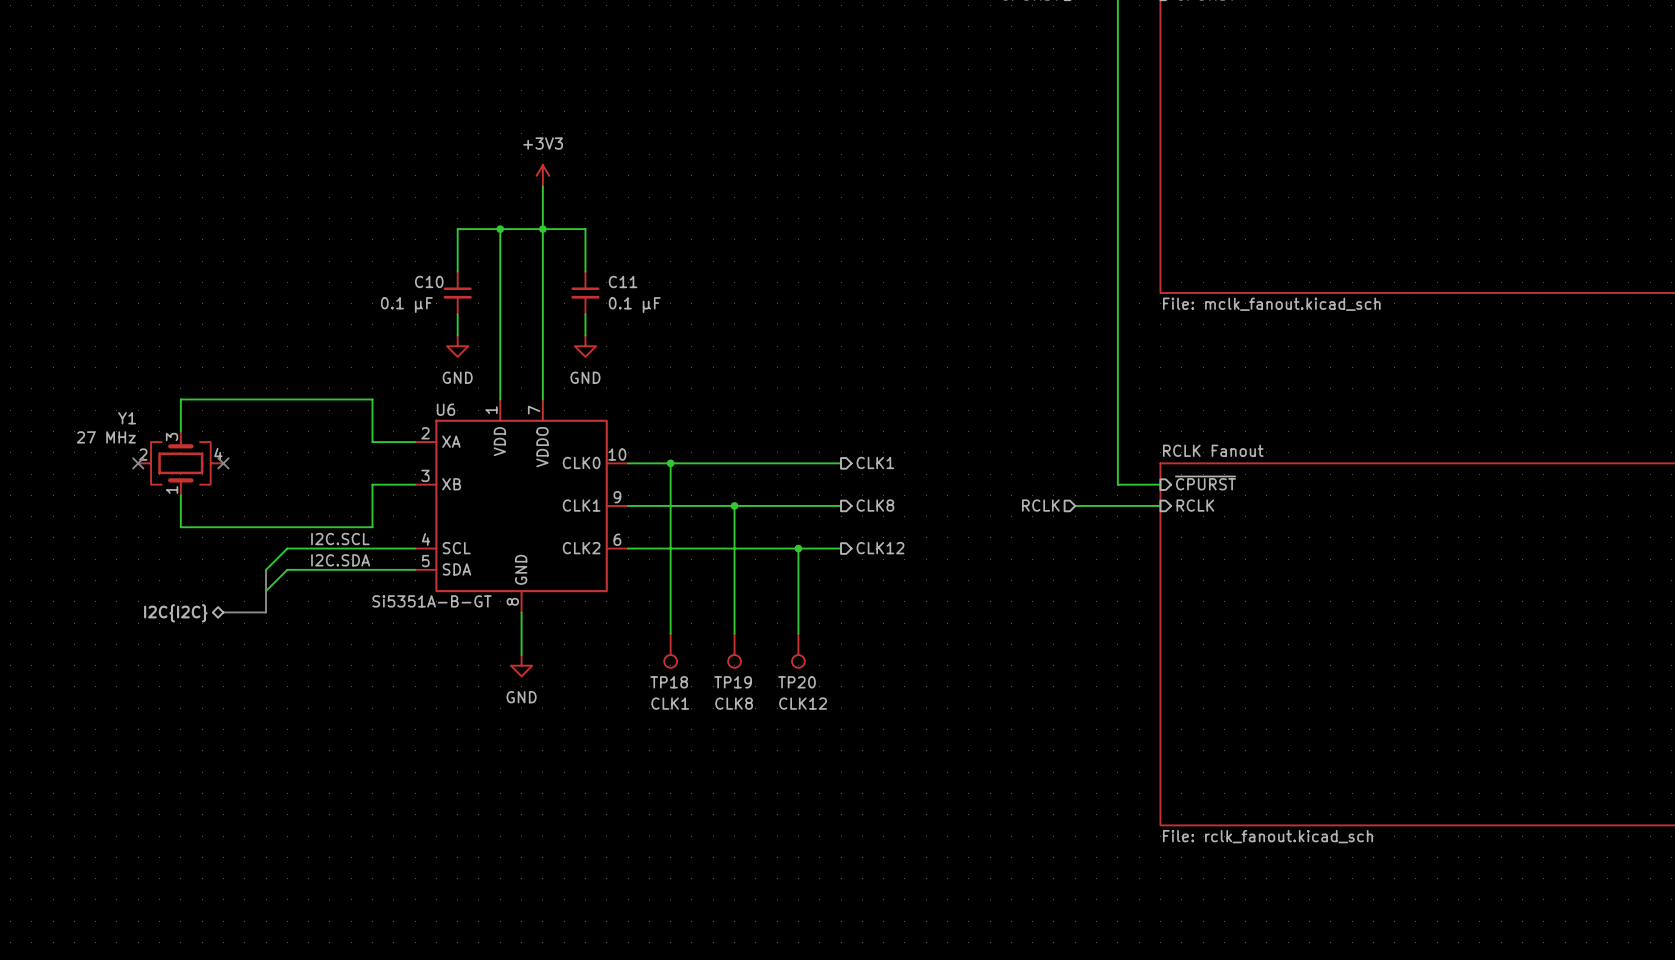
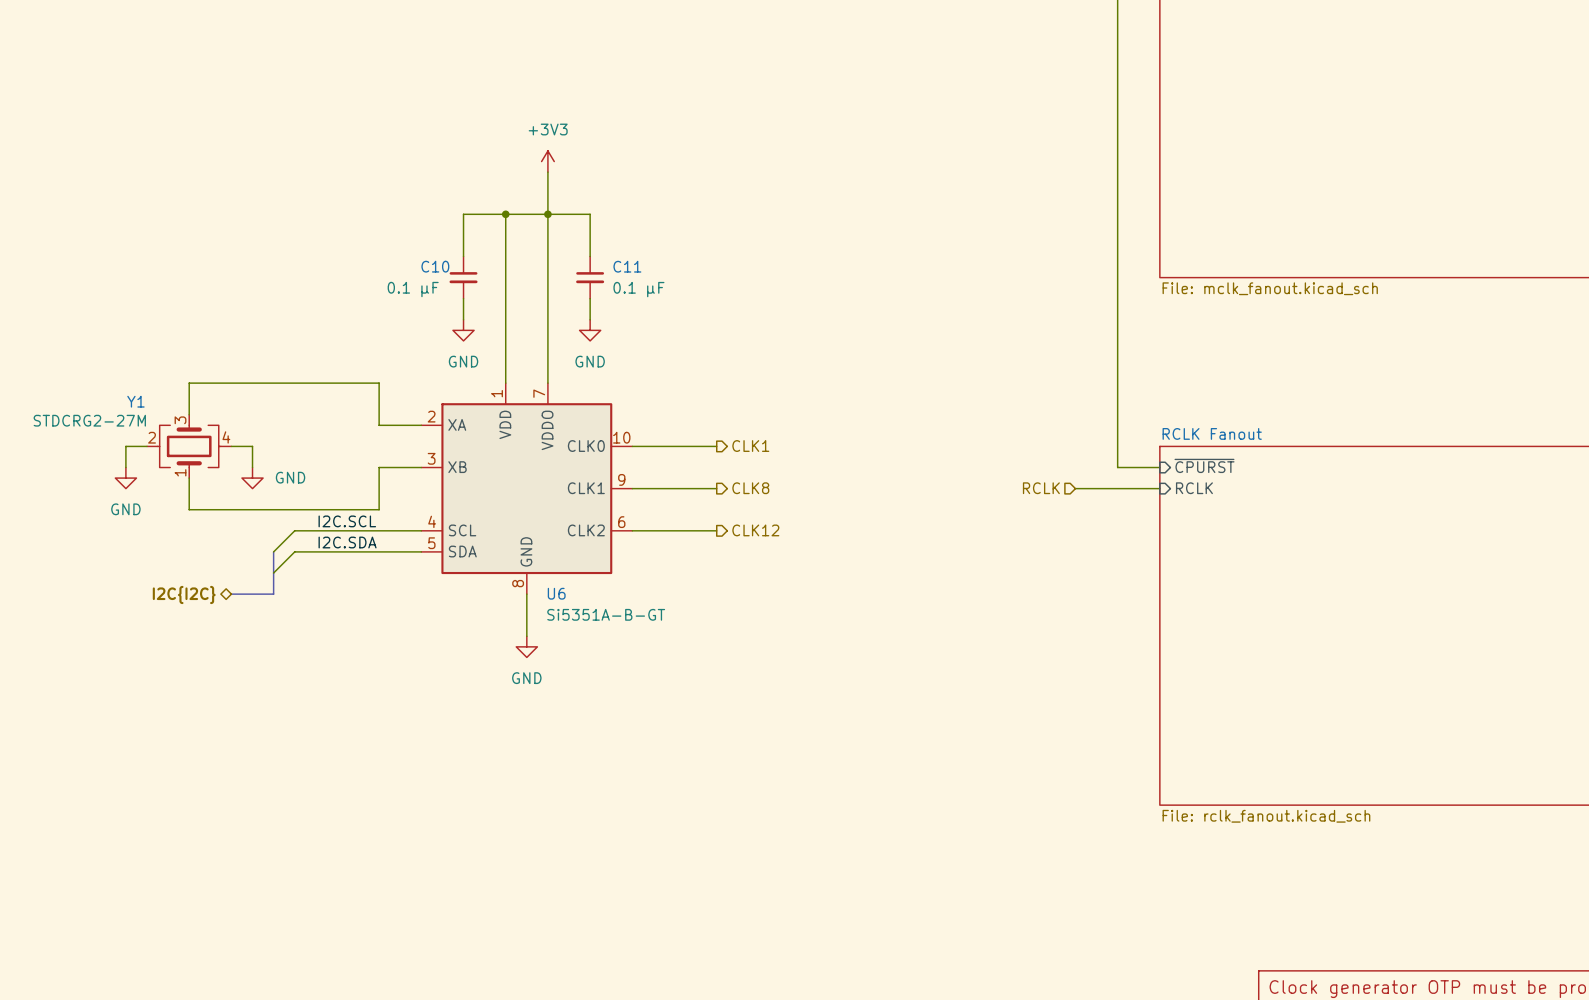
U6 name position: U6 (446, 409) -> U6 (556, 593)
Y1 value: 27 MHz (106, 437) -> STDCRG2-27M (89, 420)
hierarchical label position: CLK1 (875, 462) -> CLK1 (750, 446)
wire: none -> (147, 446) (125, 446) (125, 467)
no-connect mark: (138, 463) -> none
wire: none -> (231, 446) (252, 446) (252, 467)
no-connect mark: (223, 463) -> none
wire: (670, 463) (670, 633) -> none
junction: (670, 463) -> none
wire: (713, 463) (841, 463) -> none
power symbol: none -> GND (125, 478)
power symbol: none -> GND (252, 478)
wire: (713, 505) (841, 505) -> none
wire: (734, 505) (734, 633) -> none
junction: (734, 505) -> none
hierarchical label position: CLK8 (875, 505) -> CLK8 (750, 488)
wire: (713, 548) (841, 548) -> none
wire: (798, 548) (798, 633) -> none
junction: (798, 548) -> none
hierarchical label position: CLK12 (880, 548) -> CLK12 (755, 530)
U6 value position: Si5351A-B-GT (432, 601) -> Si5351A-B-GT (606, 614)
TP18: CLK1 (670, 650) -> none
TP19: CLK8 (734, 650) -> none
TP20: CLK12 (798, 650) -> none

